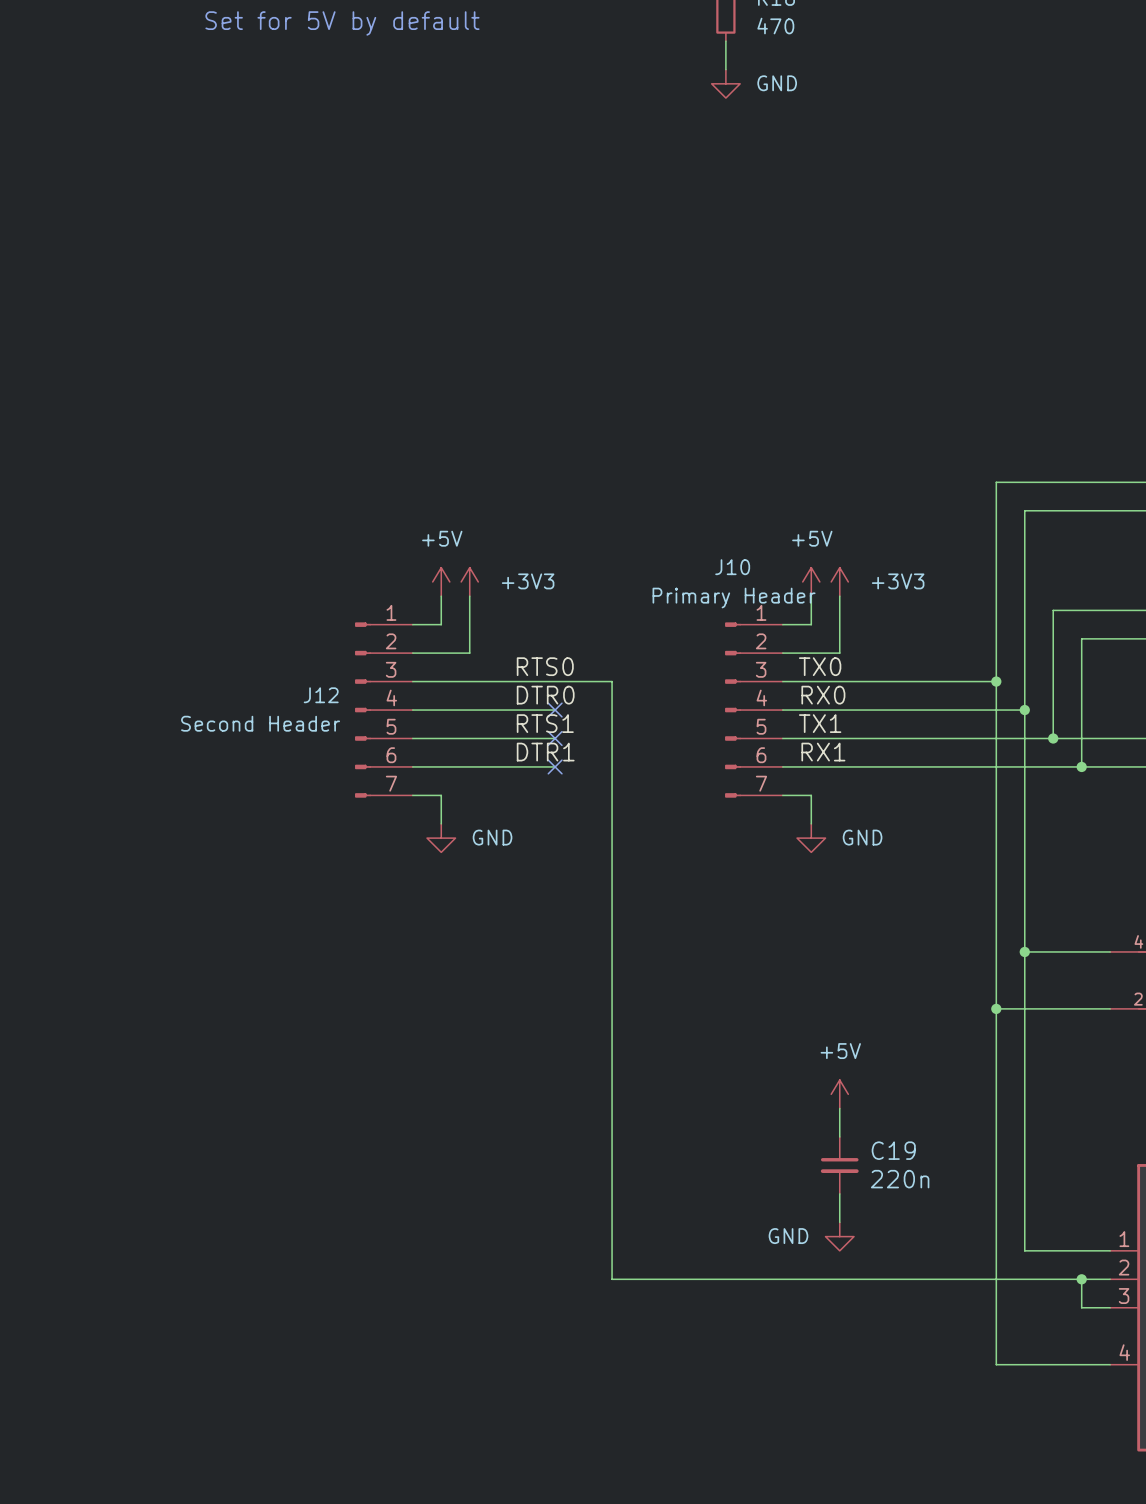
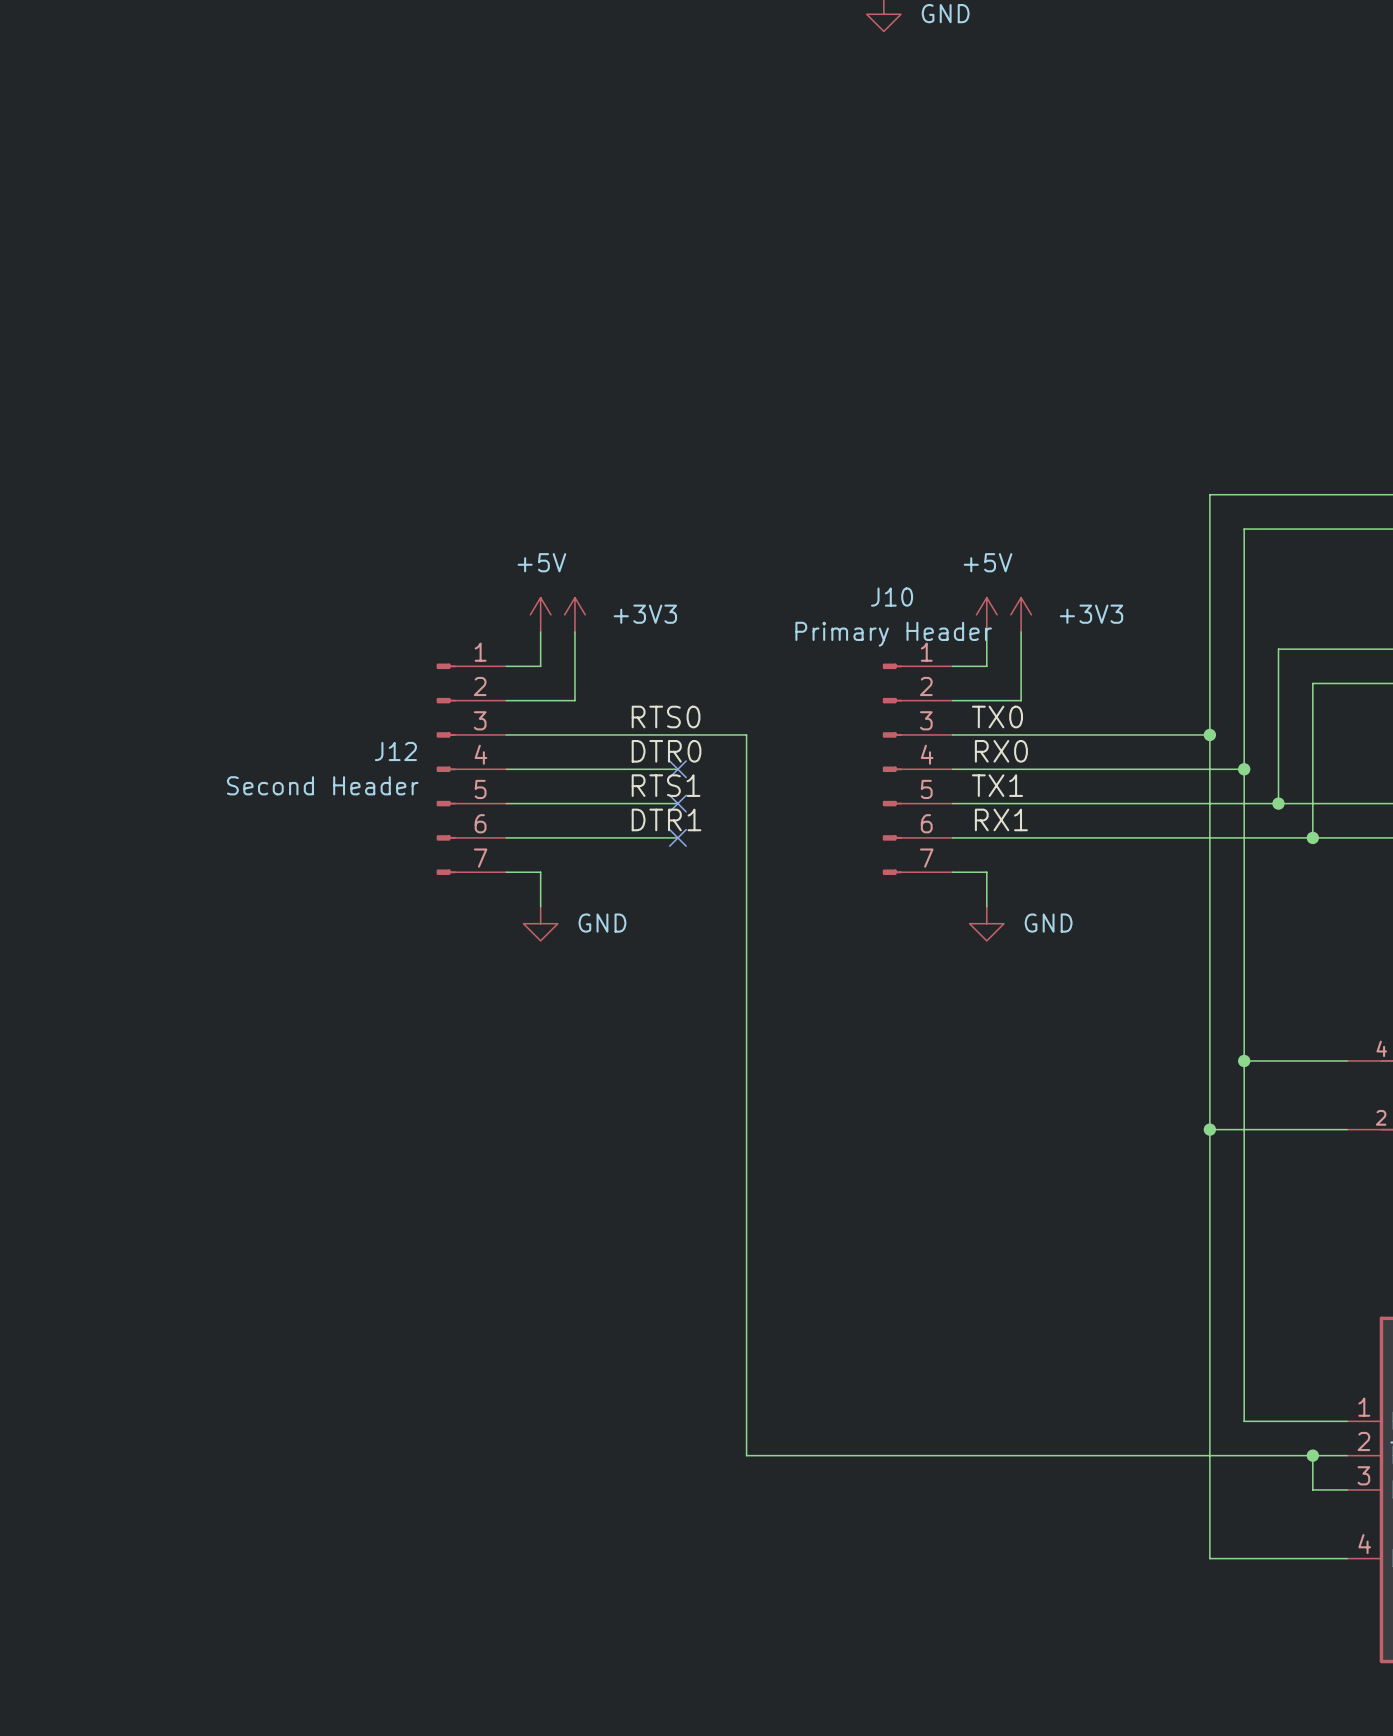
power symbol: +5V (839, 1094) -> none
wire: (839, 1108) (839, 1136) -> none
C19: 220n (839, 1165) -> none
wire: (839, 1193) (839, 1222) -> none
power symbol: GND (839, 1236) -> none

